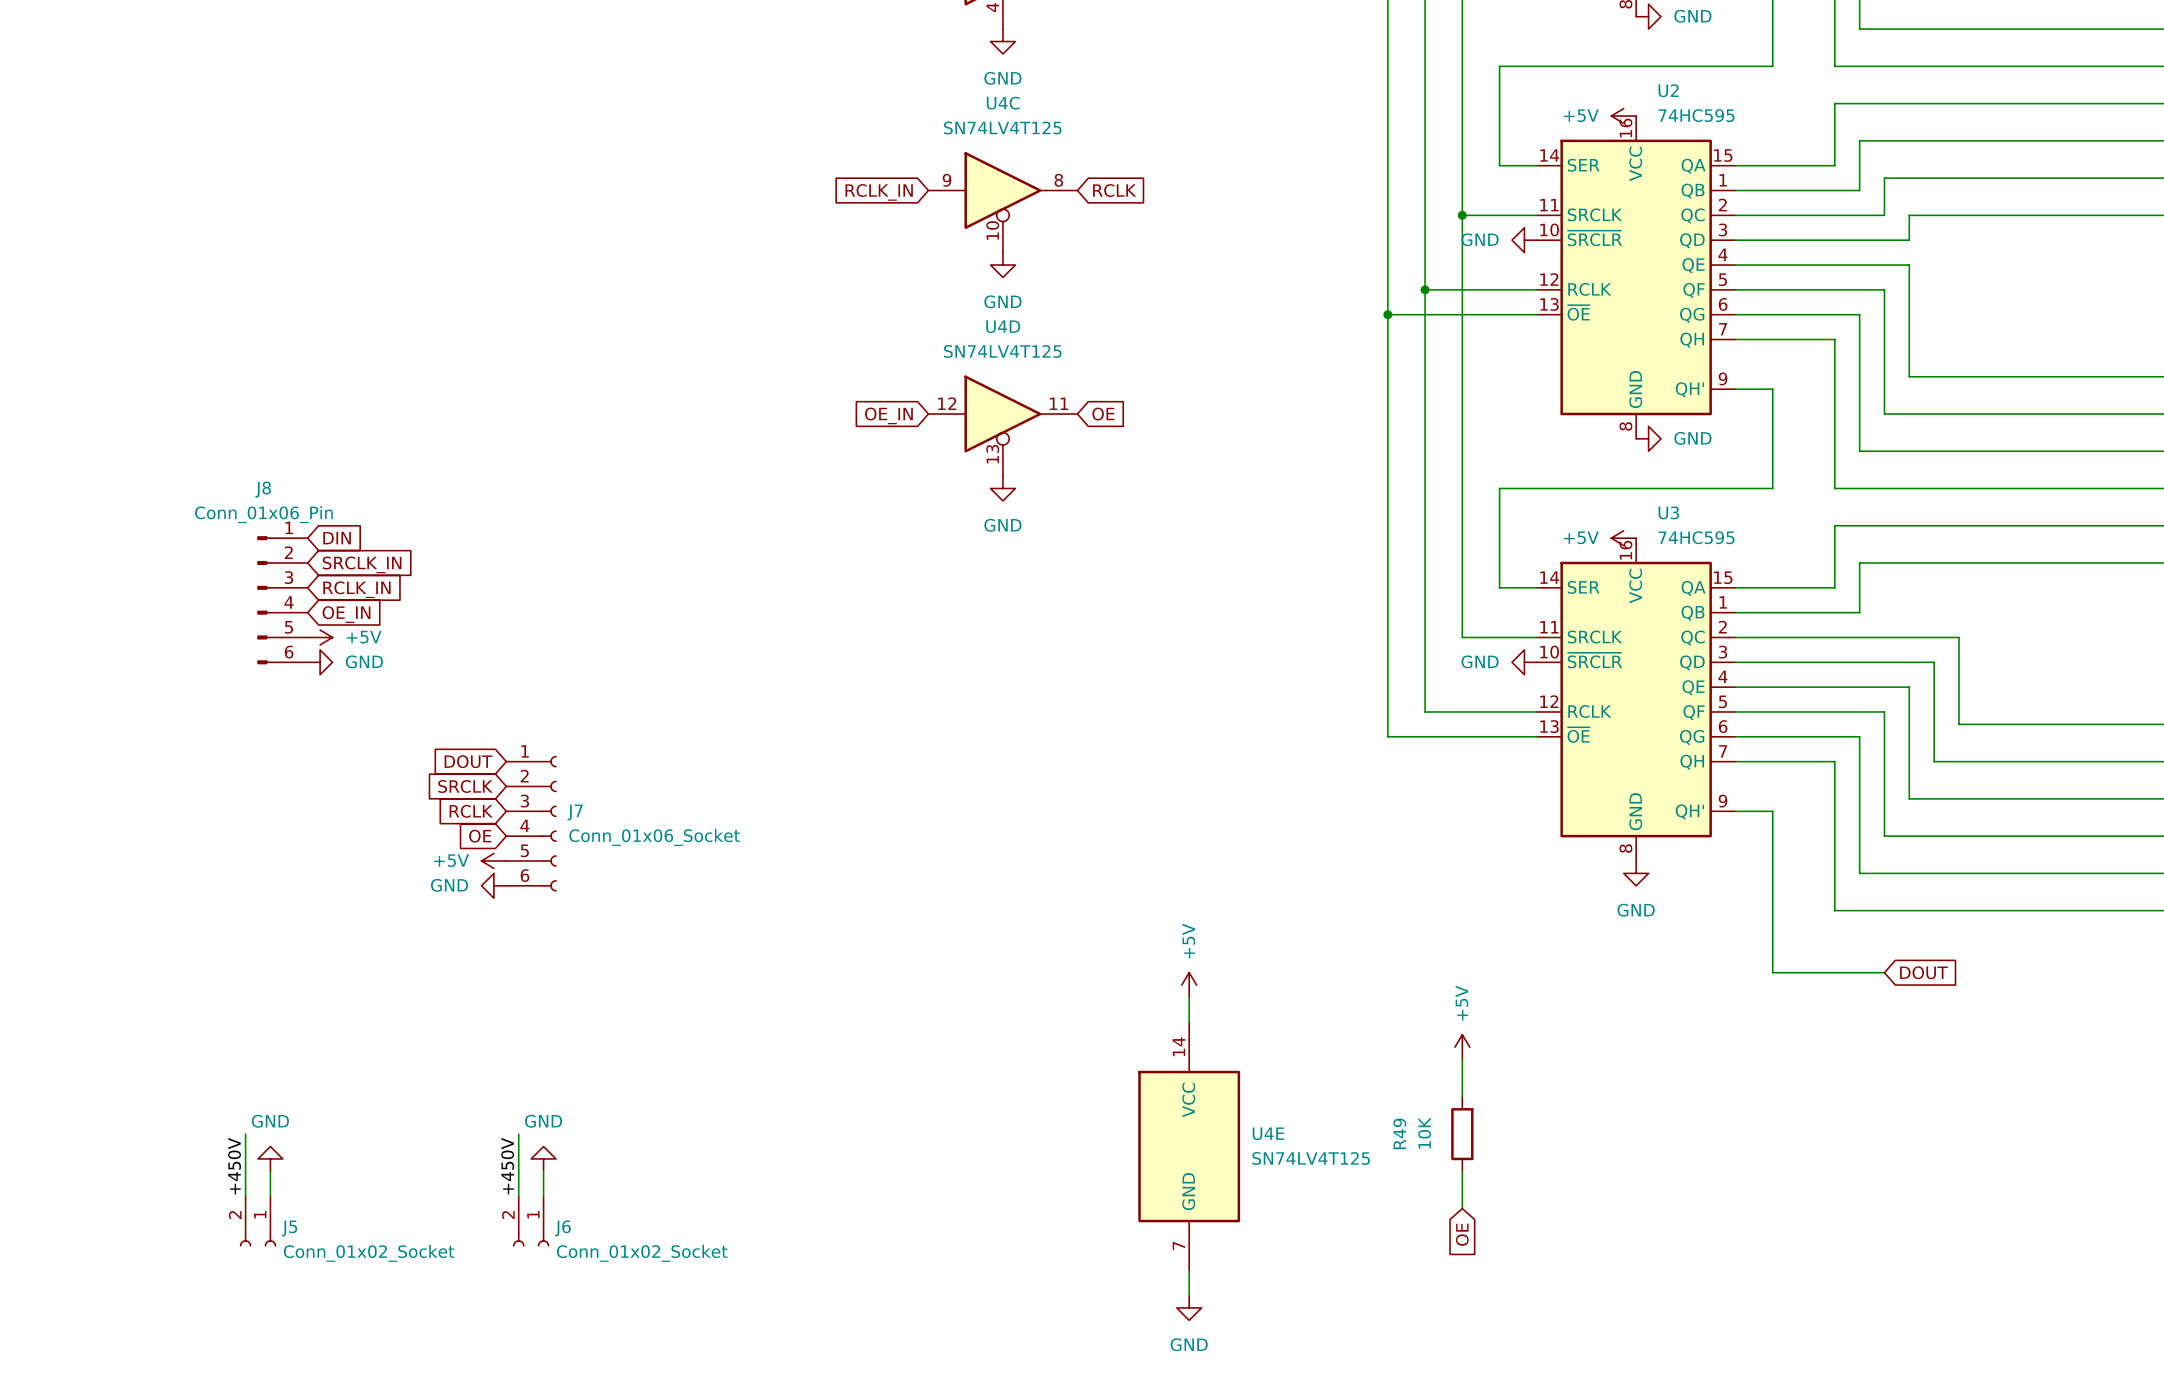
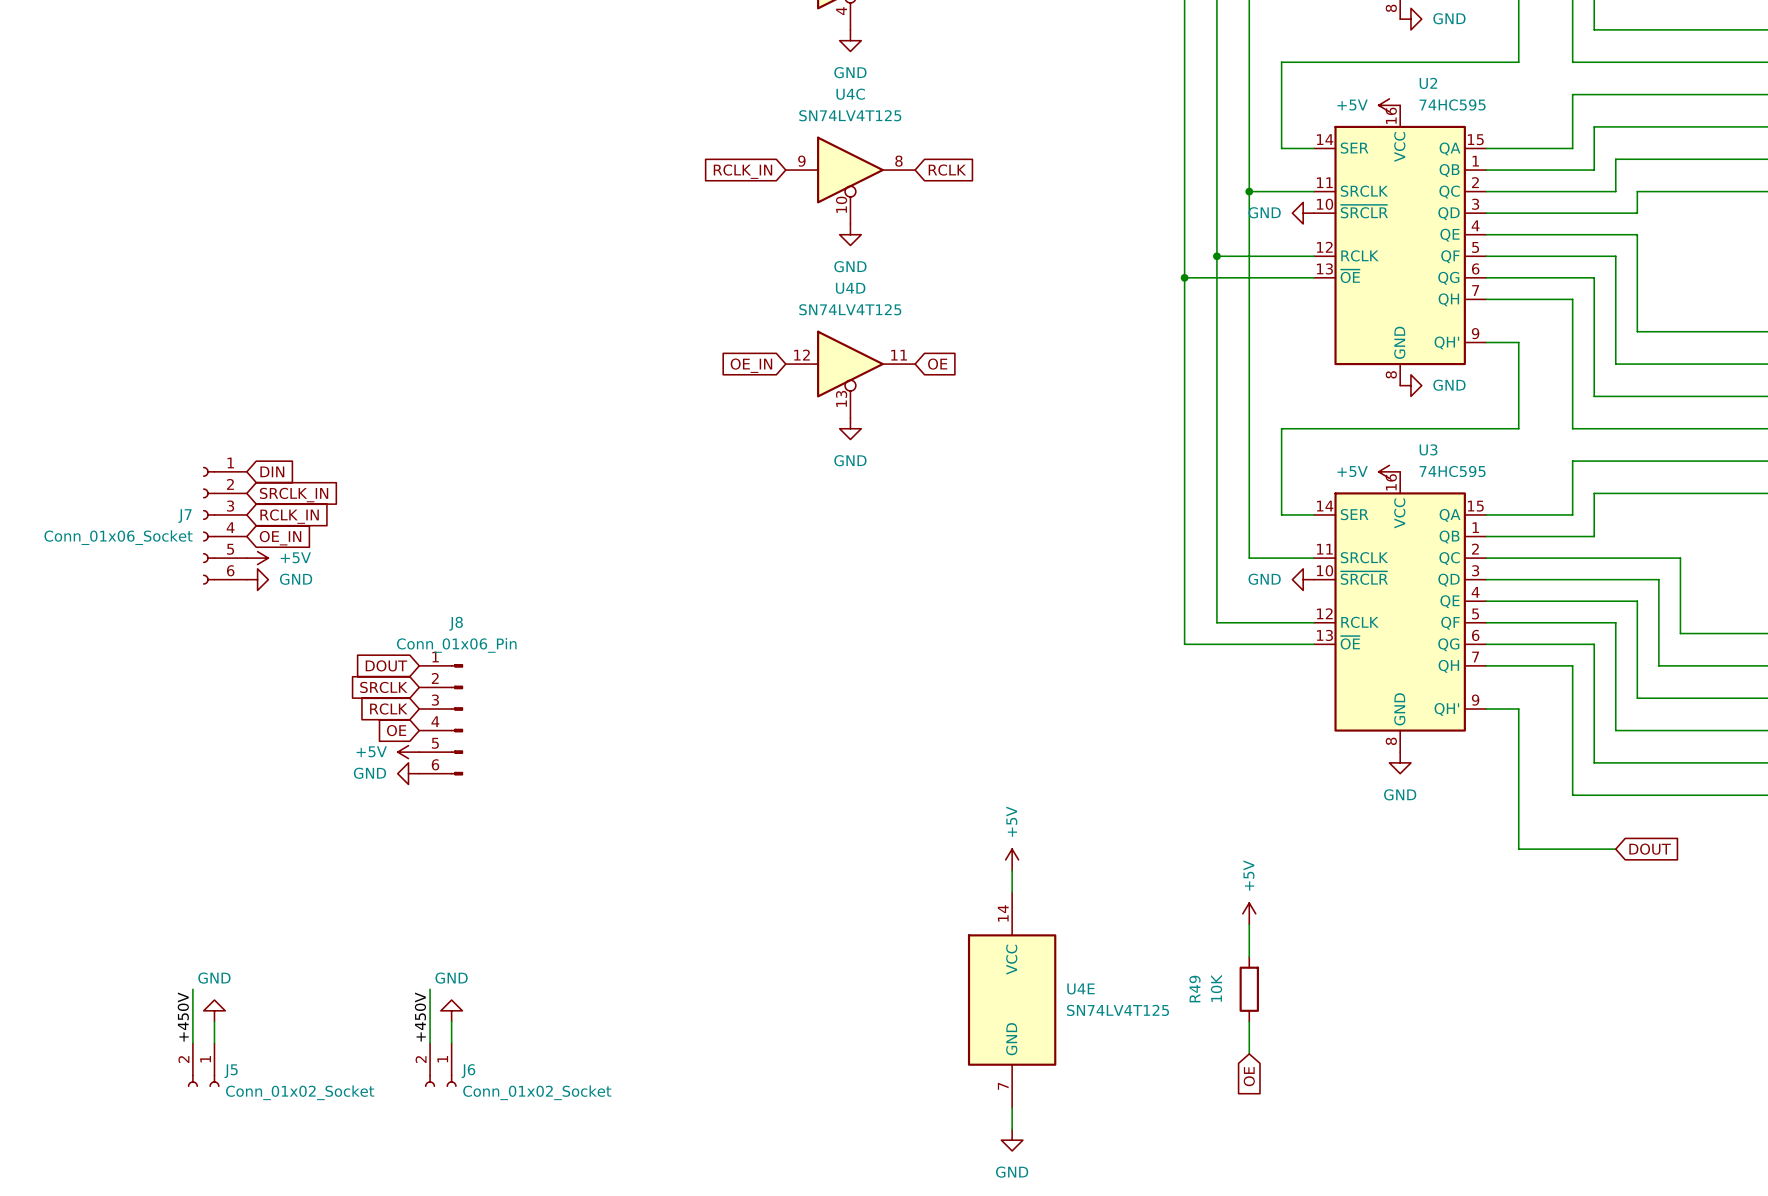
J8 flip: as is (264, 600) -> left-right (457, 719)
J8 position: (282, 600) -> (441, 719)
J7 position: (531, 823) -> (224, 525)
J7 flip: as is (549, 823) -> left-right (209, 525)

